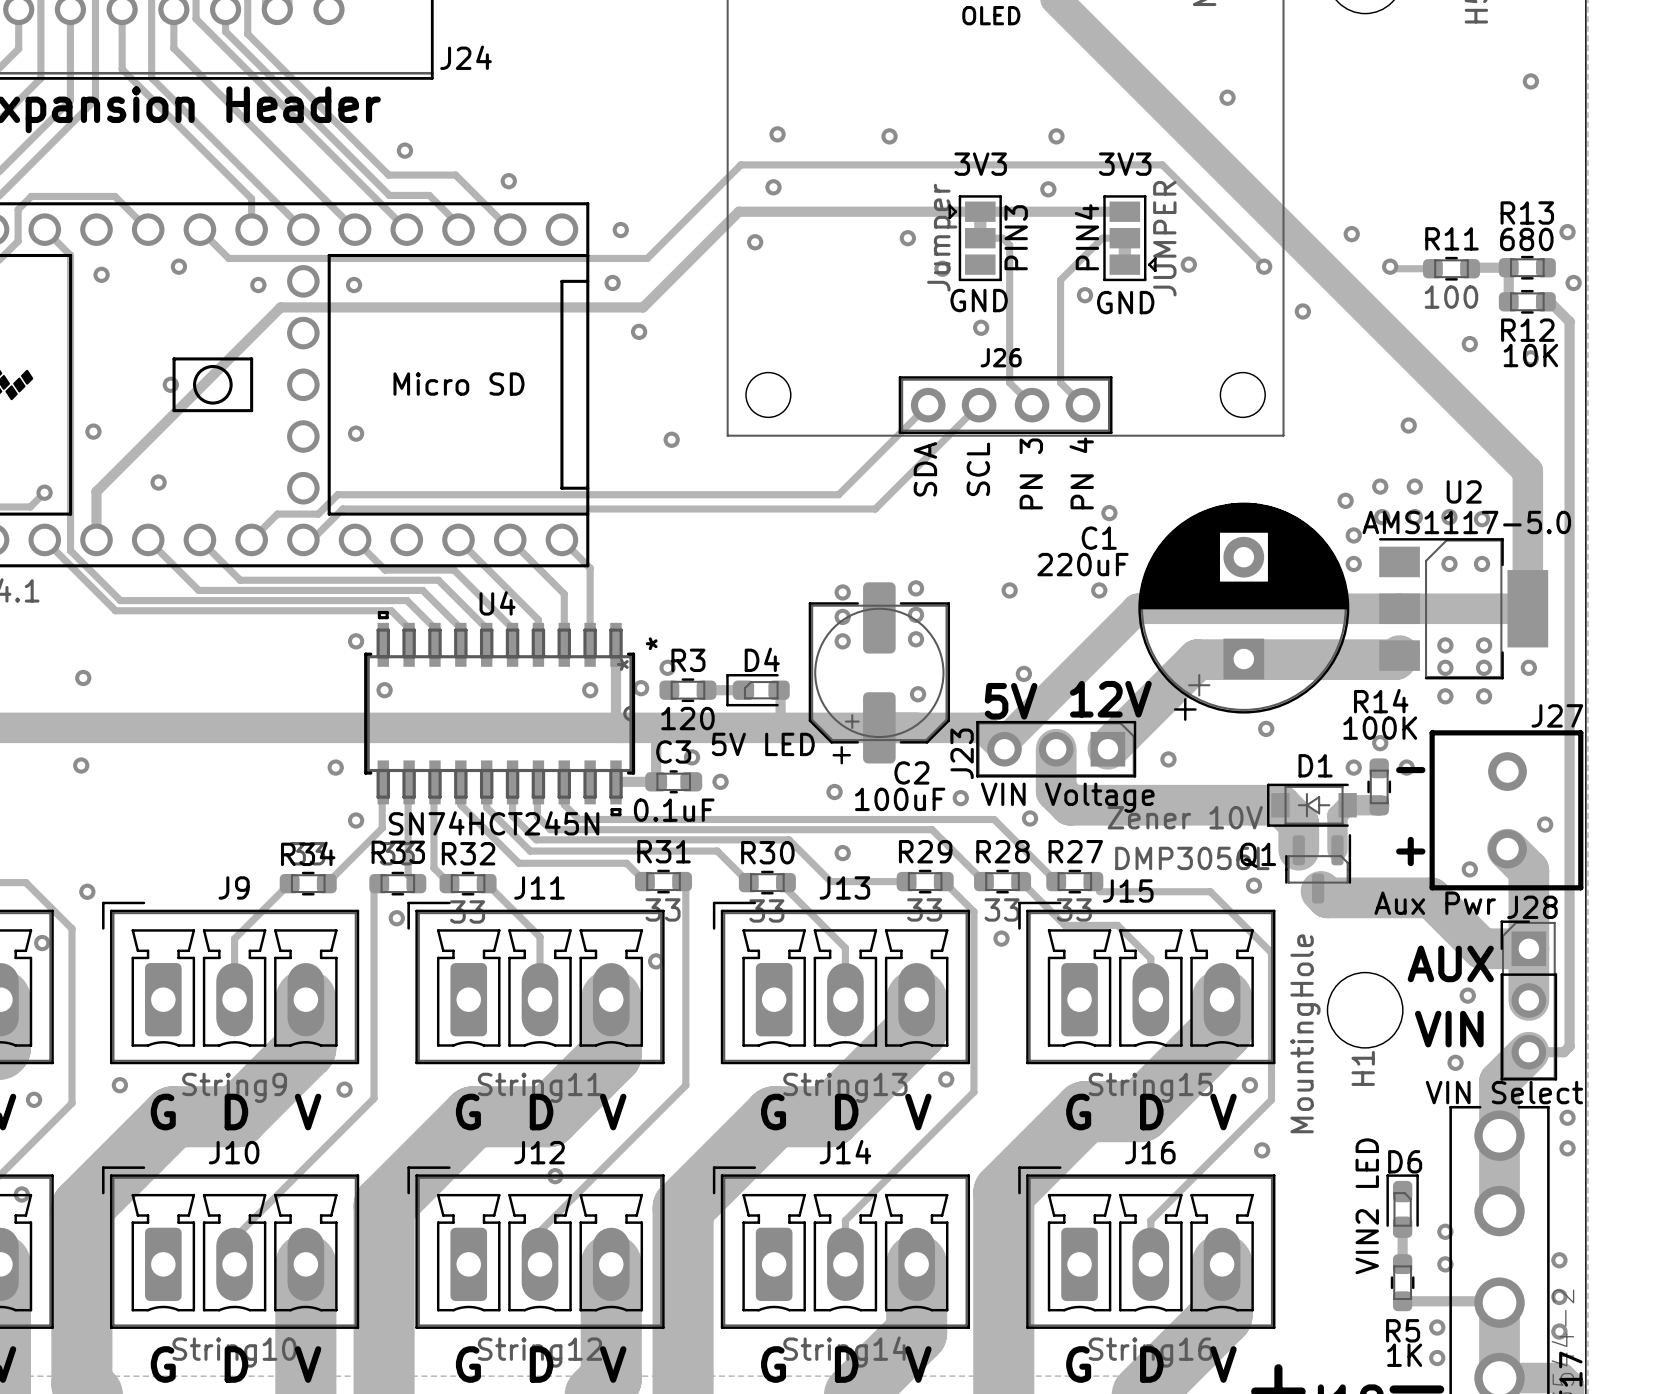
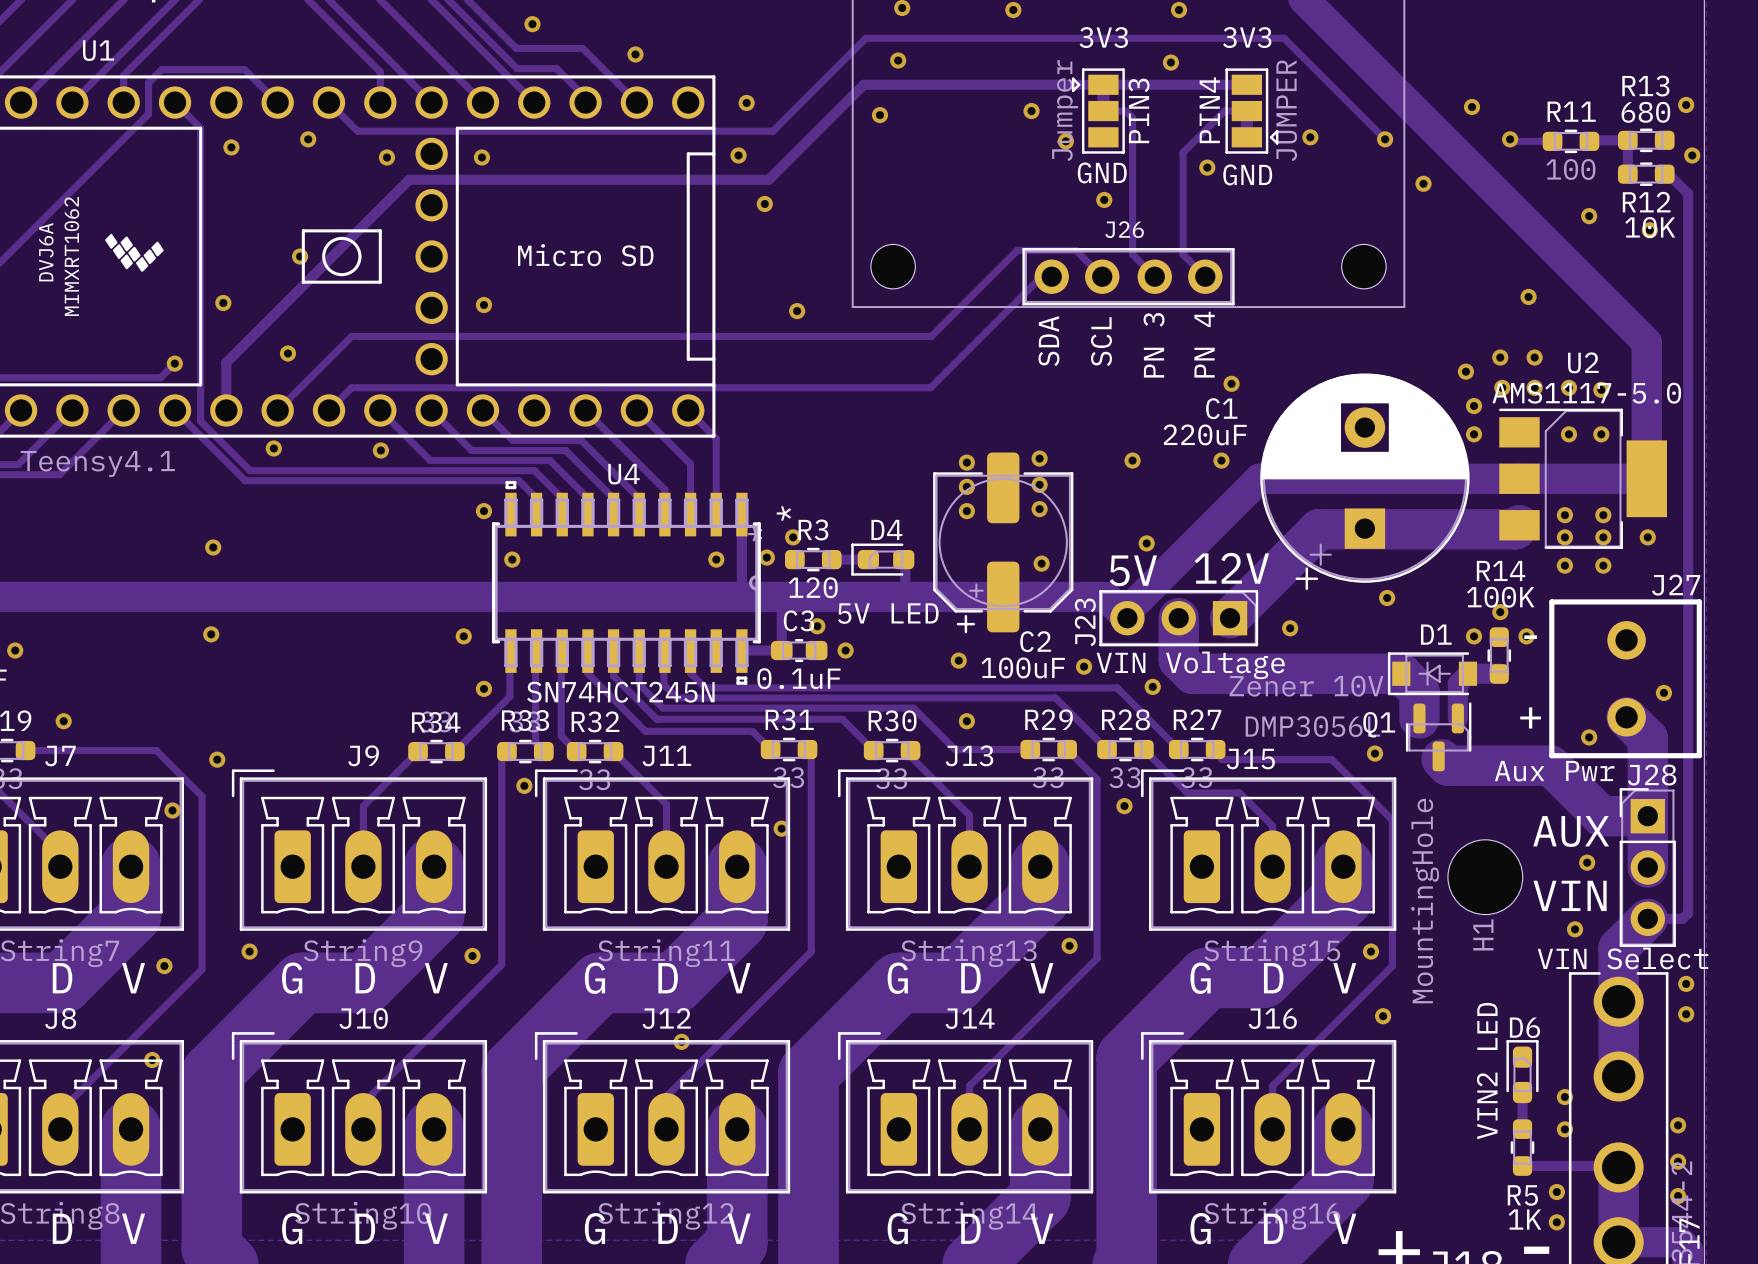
track: (928, 405) (838, 494) (337, 494) (318, 514) (277, 514) (251, 539) -> (1051, 276) (1041, 276) (930, 387) (351, 387) (328, 410)
track: (979, 405) (875, 508) (342, 508) (311, 539) (303, 539) -> (1102, 276) (1075, 250) (1017, 250) (931, 336) (351, 336) (277, 410)
track: (148, 539) (198, 590) (302, 590) -> (380, 410) (430, 460)
track: (199, 539) (240, 580) (343, 580) -> (431, 410) (471, 450)
via: none -> (273, 448)
via: none -> (380, 450)

